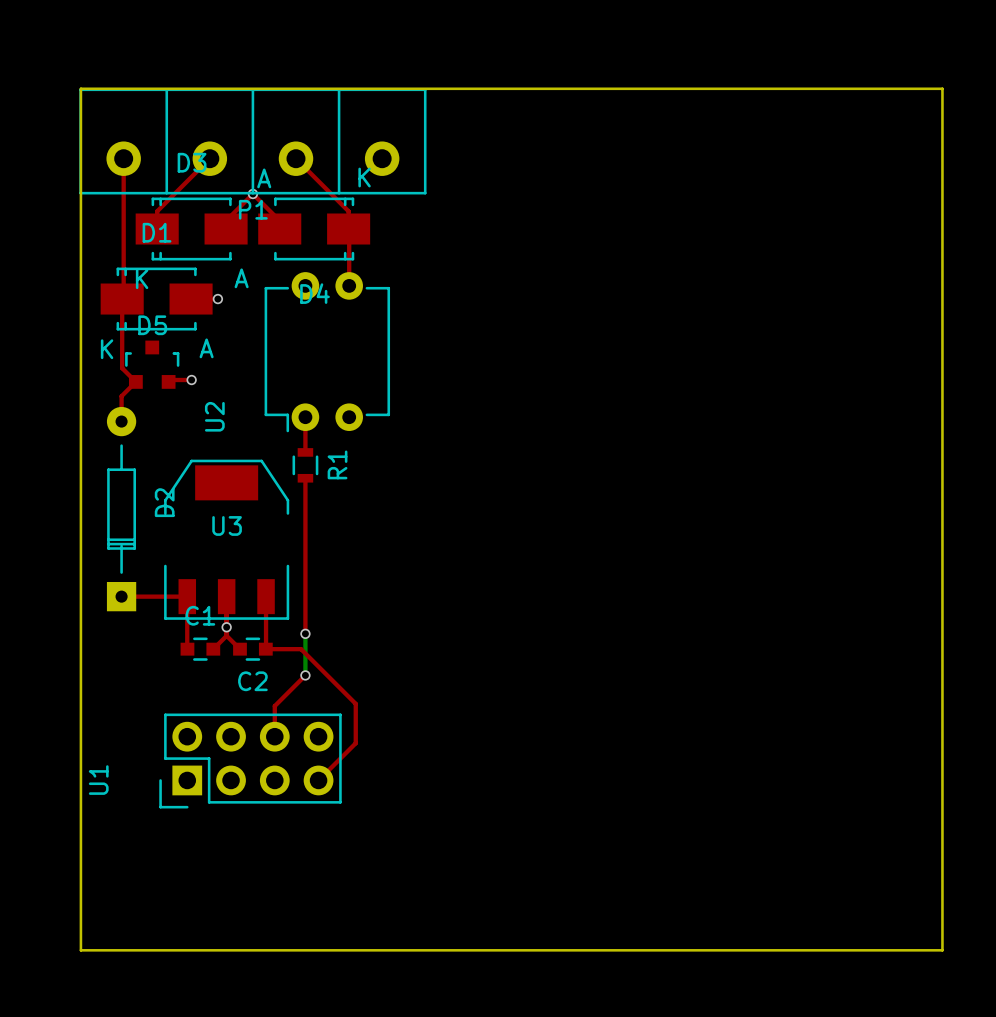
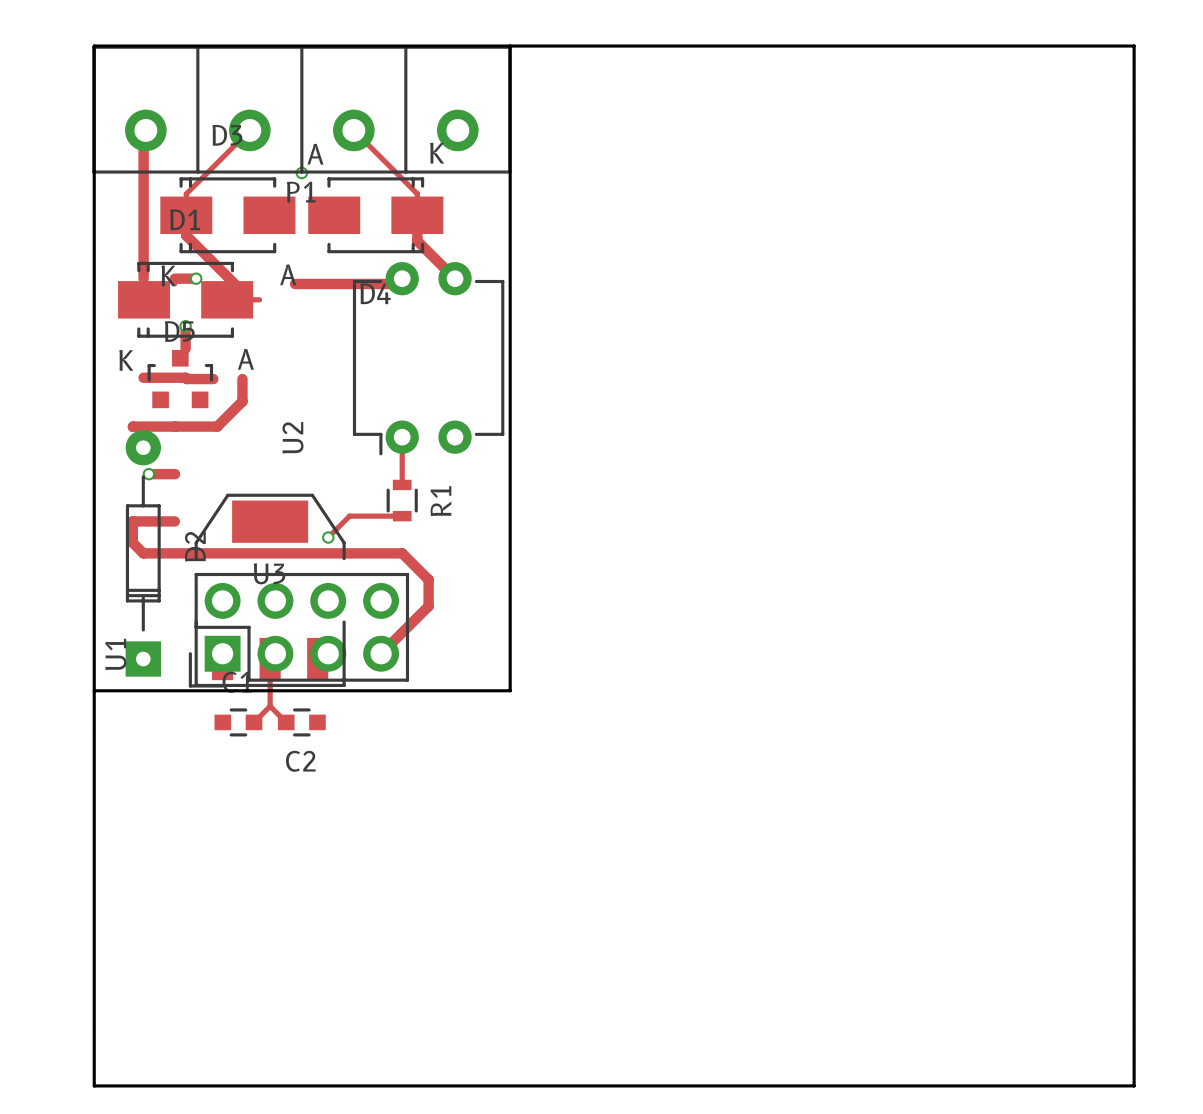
board edge: none -> (510, 46) (510, 690) (94, 690)
top track: (123, 158) (122, 368) (135, 381) (121, 396) (121, 421) -> (145, 130) (143, 132) (143, 278) (145, 276)
top track: (226, 220) (252, 193) (279, 220) -> none
top track: none -> (186, 215) (186, 235) (234, 283)
top track: none -> (417, 215) (417, 241) (455, 278)
top track: (349, 229) (349, 285) -> none
top track: none -> (196, 278) (174, 278) (174, 283)
via: none -> (196, 278)
top track: none -> (402, 278) (396, 283) (295, 283)
via: (217, 299) -> none
top track: none -> (185, 326) (185, 348)
via: none -> (185, 326)
U2 position: (327, 352) -> (428, 358)
top track: none -> (143, 377) (213, 379)
top track: none -> (242, 379) (242, 401) (217, 426) (133, 426)
top track: (191, 380) (170, 380) (168, 381) -> none
via: (191, 380) -> none
top track: none -> (402, 437) (402, 484)
top track: (305, 417) (305, 452) -> none
top track: none -> (148, 474) (175, 474)
via: none -> (148, 474)
R1 position: (305, 465) -> (402, 500)
top track: (305, 478) (305, 633) -> none
top track: none -> (402, 516) (349, 516) (328, 537)
top track: none -> (174, 521) (132, 521) (132, 542) (143, 553) (402, 553) (428, 579) (428, 606) (381, 653)
via: none -> (328, 537)
top track: (121, 596) (187, 596) (187, 648) -> none
top track: (266, 596) (266, 648) -> none
via: (226, 627) -> none
bottom track: (305, 633) (305, 675) -> none
via: (305, 633) -> none
top track: (265, 649) (301, 649) (355, 703) (355, 743) (318, 780) -> none
top track: (305, 675) (274, 706) (274, 736) -> none
via: (305, 675) -> none
U1 position: (250, 760) -> (298, 630)

